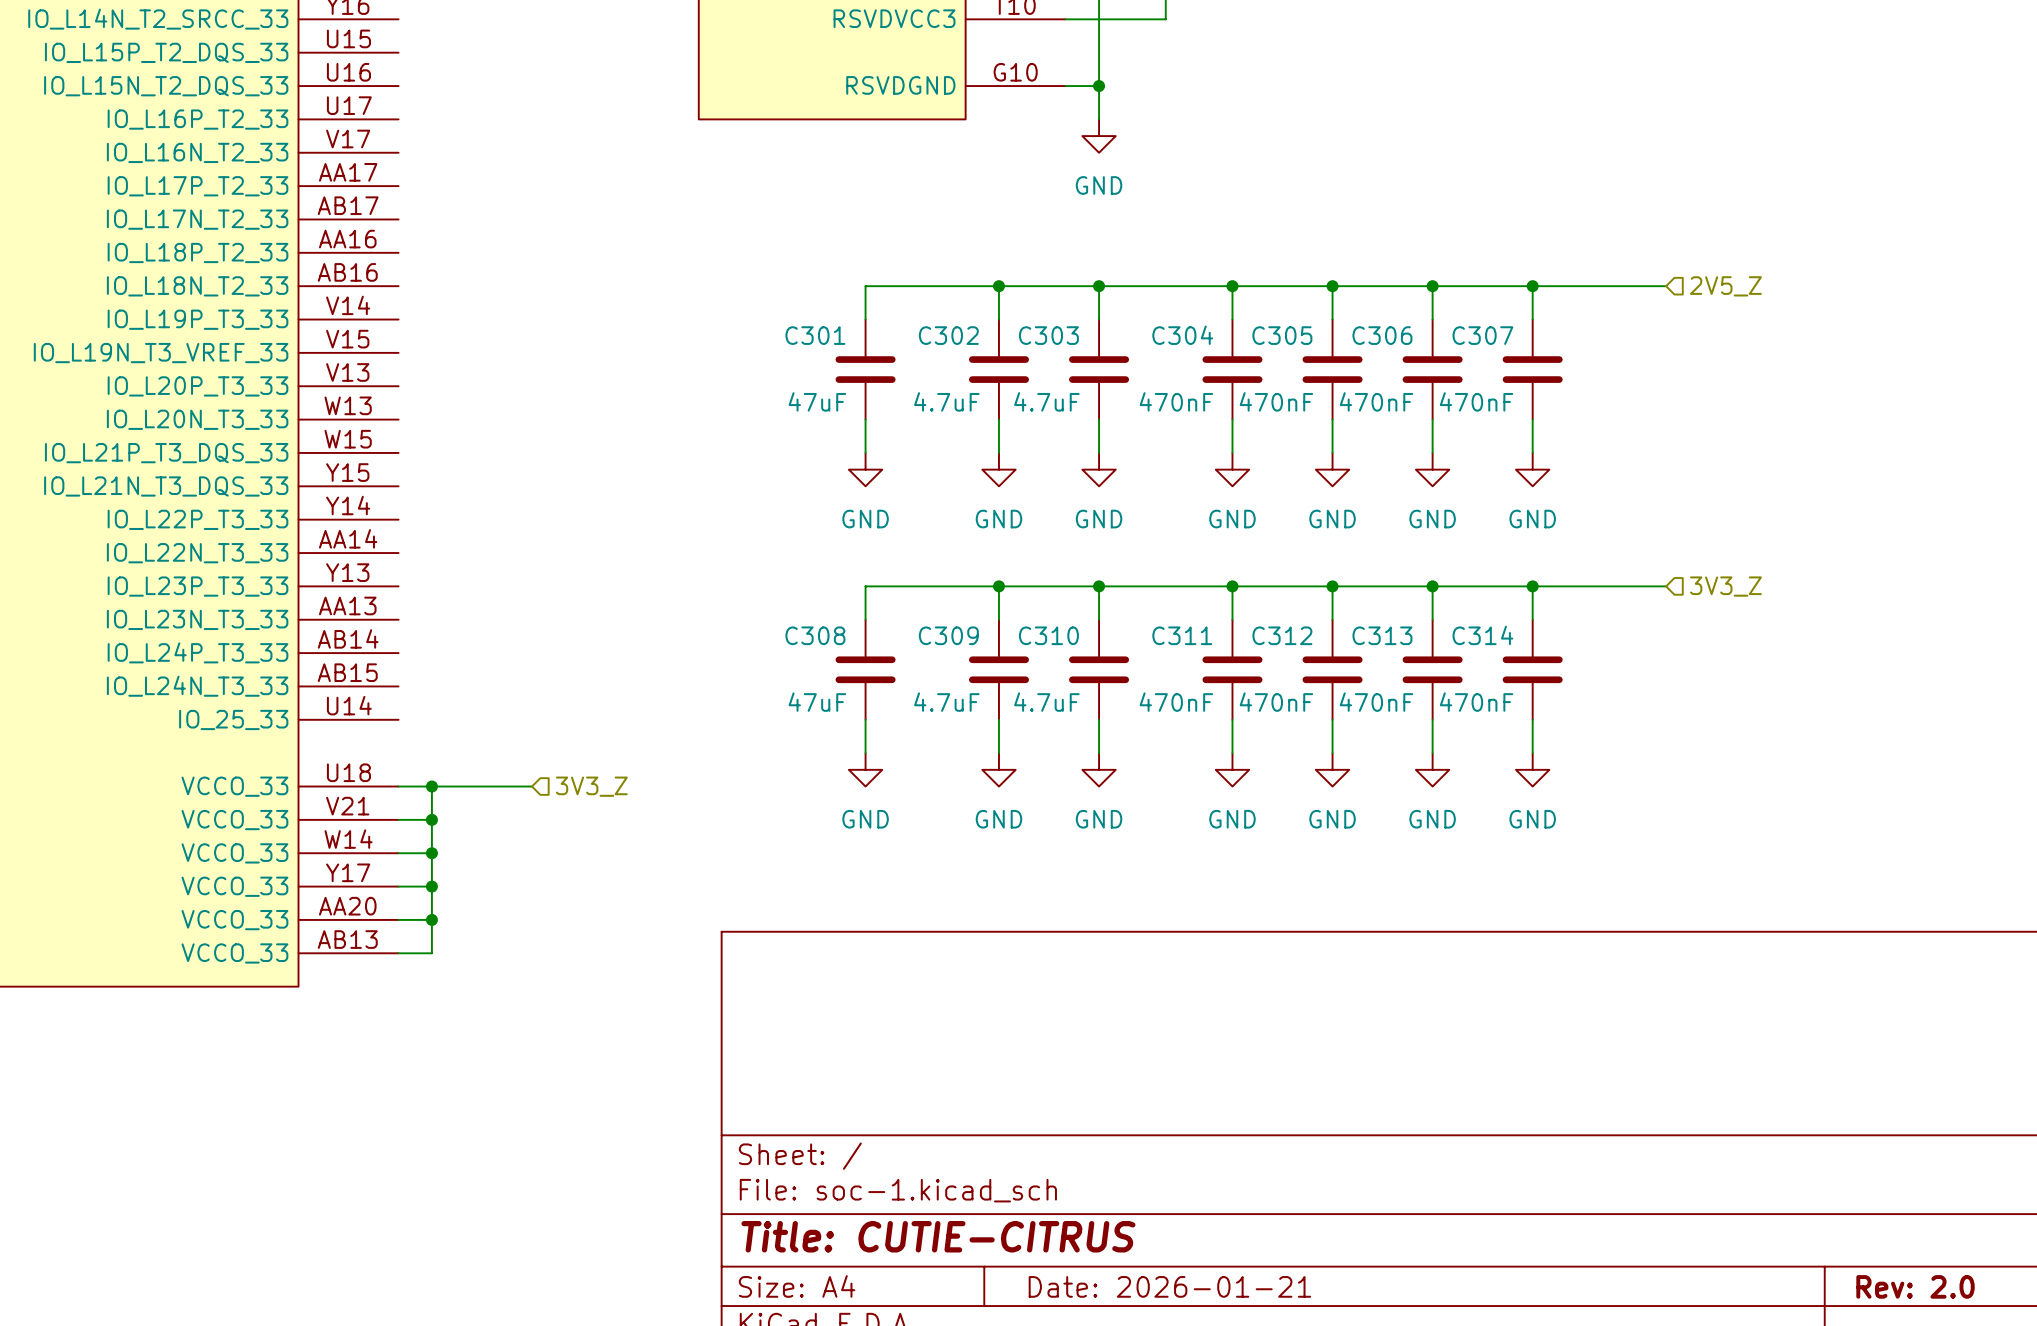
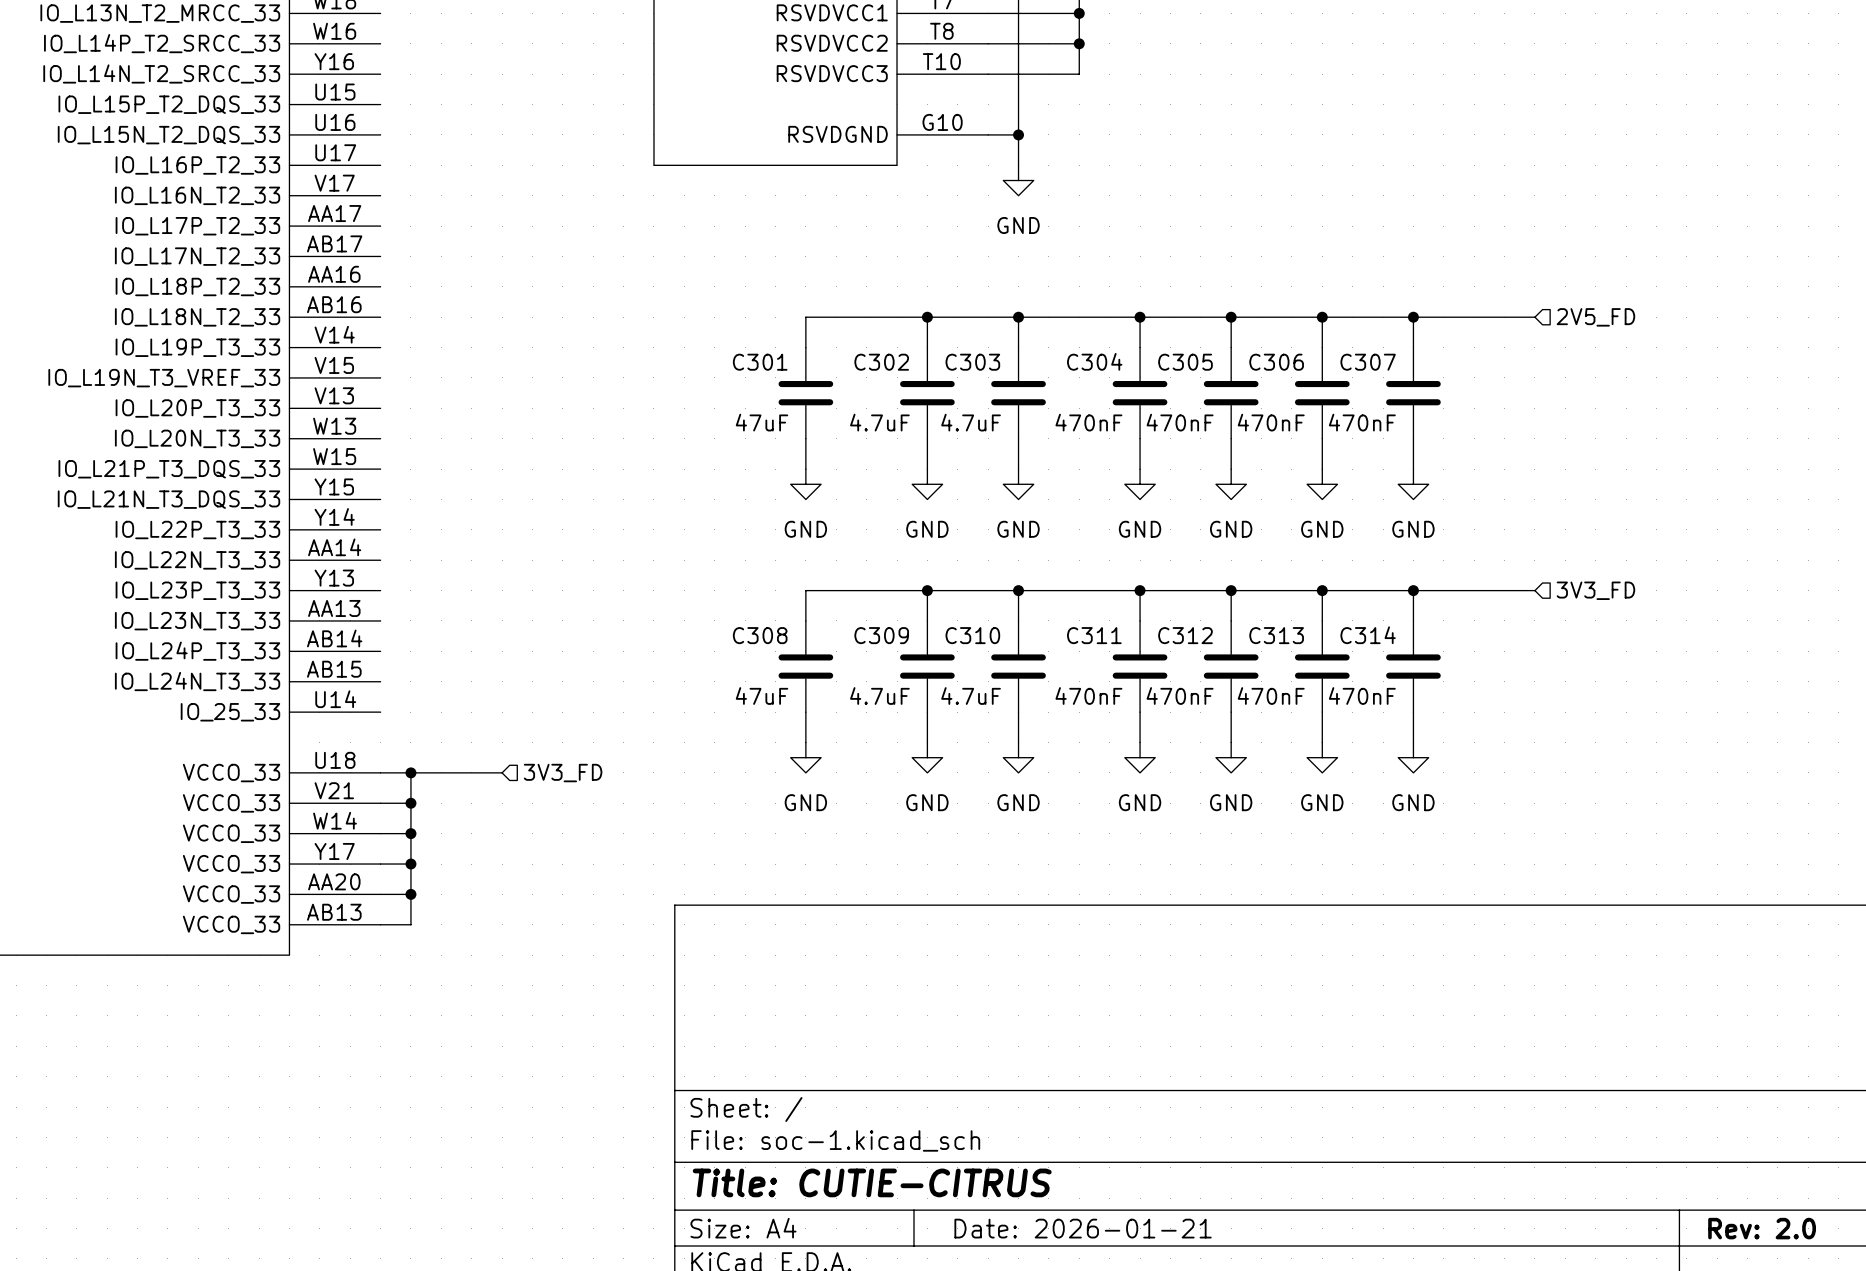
hierarchical label: 2V5_Z (1725, 286) -> 2V5_FD (1595, 317)
hierarchical label: 3V3_Z (1725, 586) -> 3V3_FD (1595, 590)
hierarchical label: 3V3_Z (591, 786) -> 3V3_FD (563, 773)

